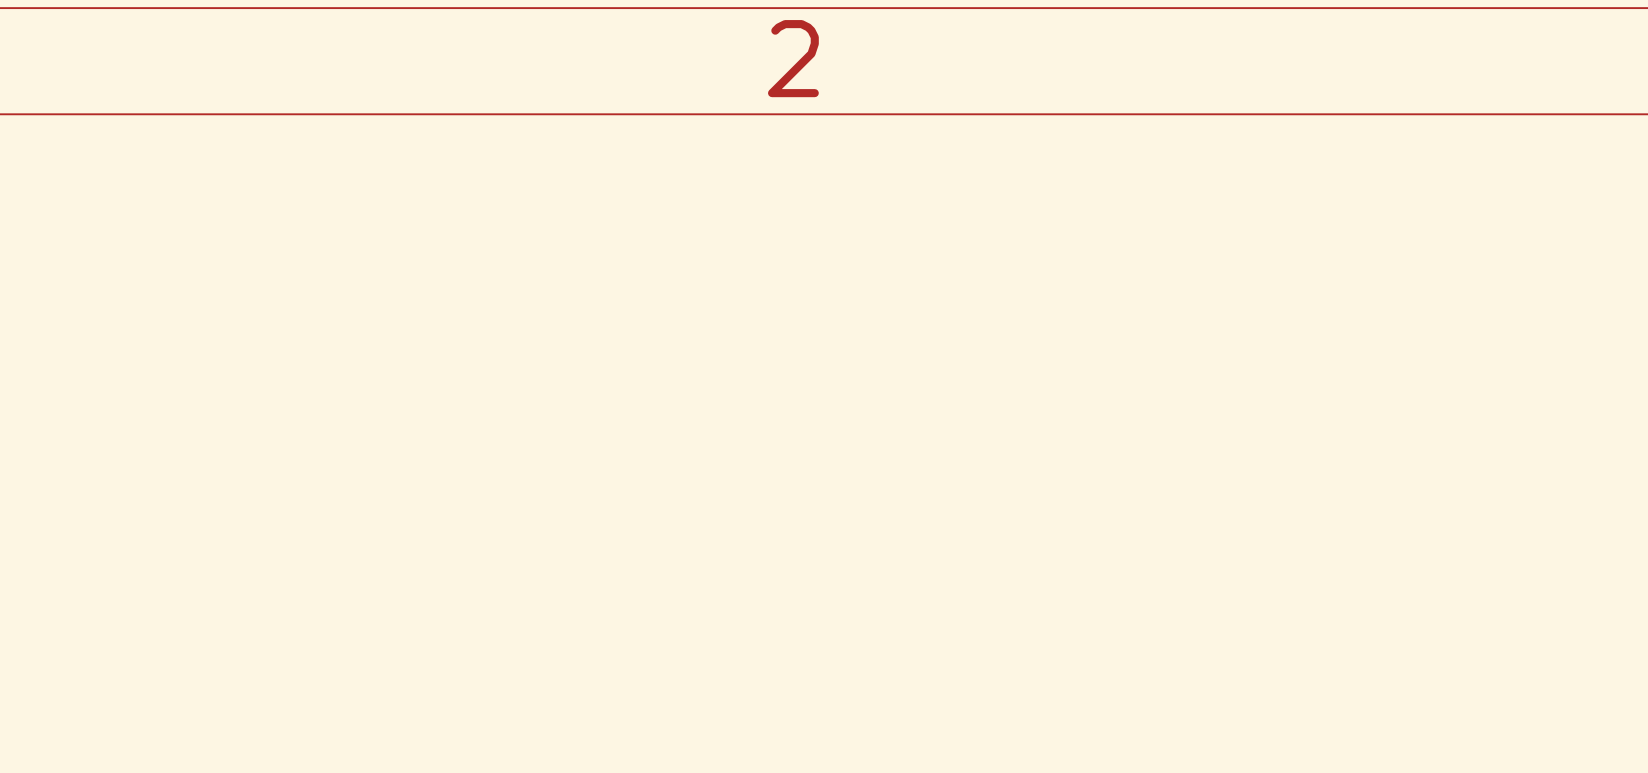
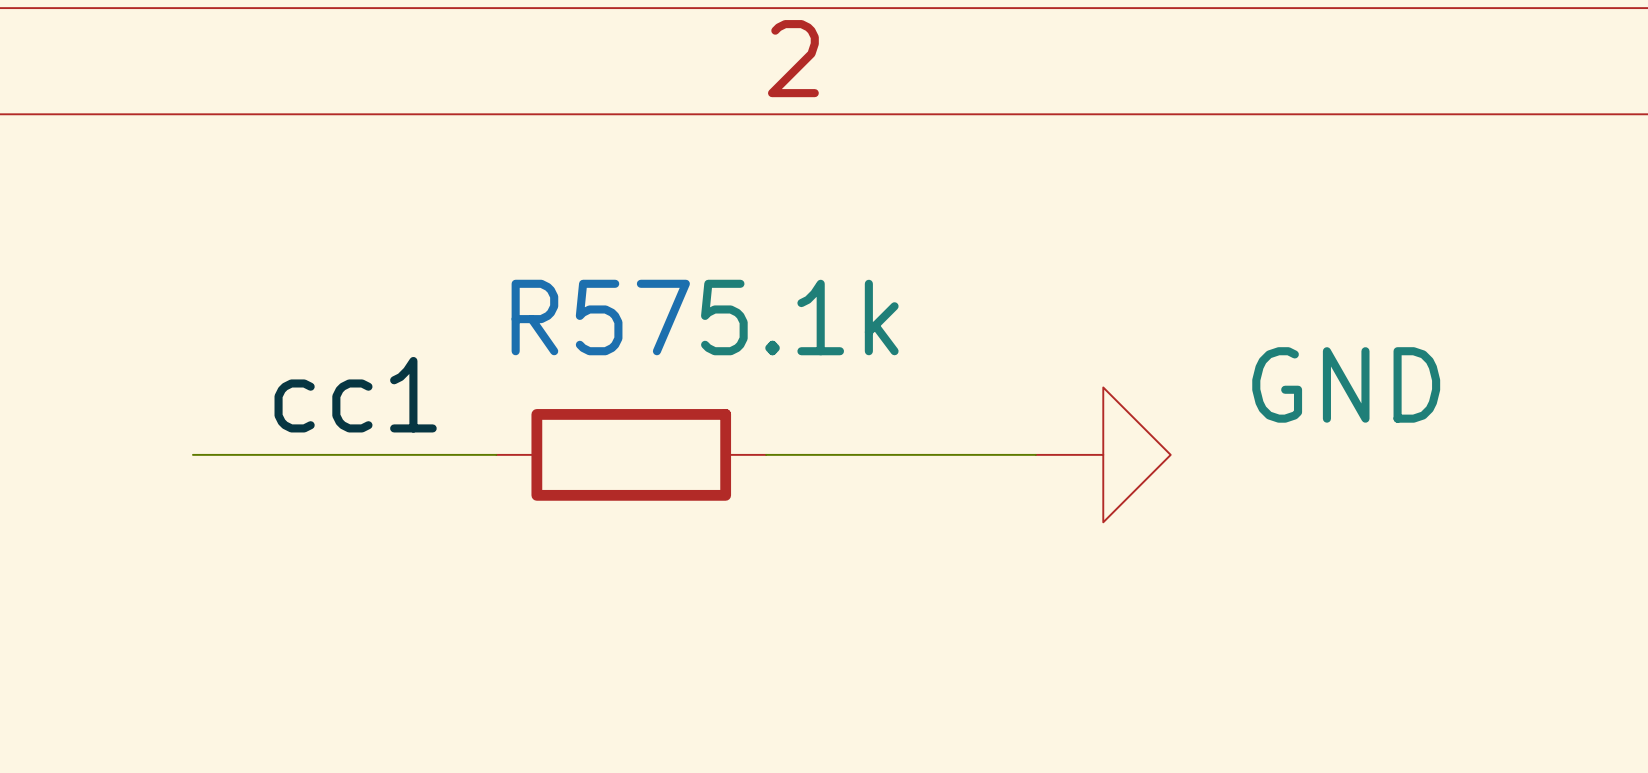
label: none -> cc1 (355, 394)
wire: none -> (192, 454) (496, 454)
R57: none -> 5.1k (631, 454)
wire: none -> (766, 454) (1035, 454)
power symbol: none -> GND (1103, 454)

